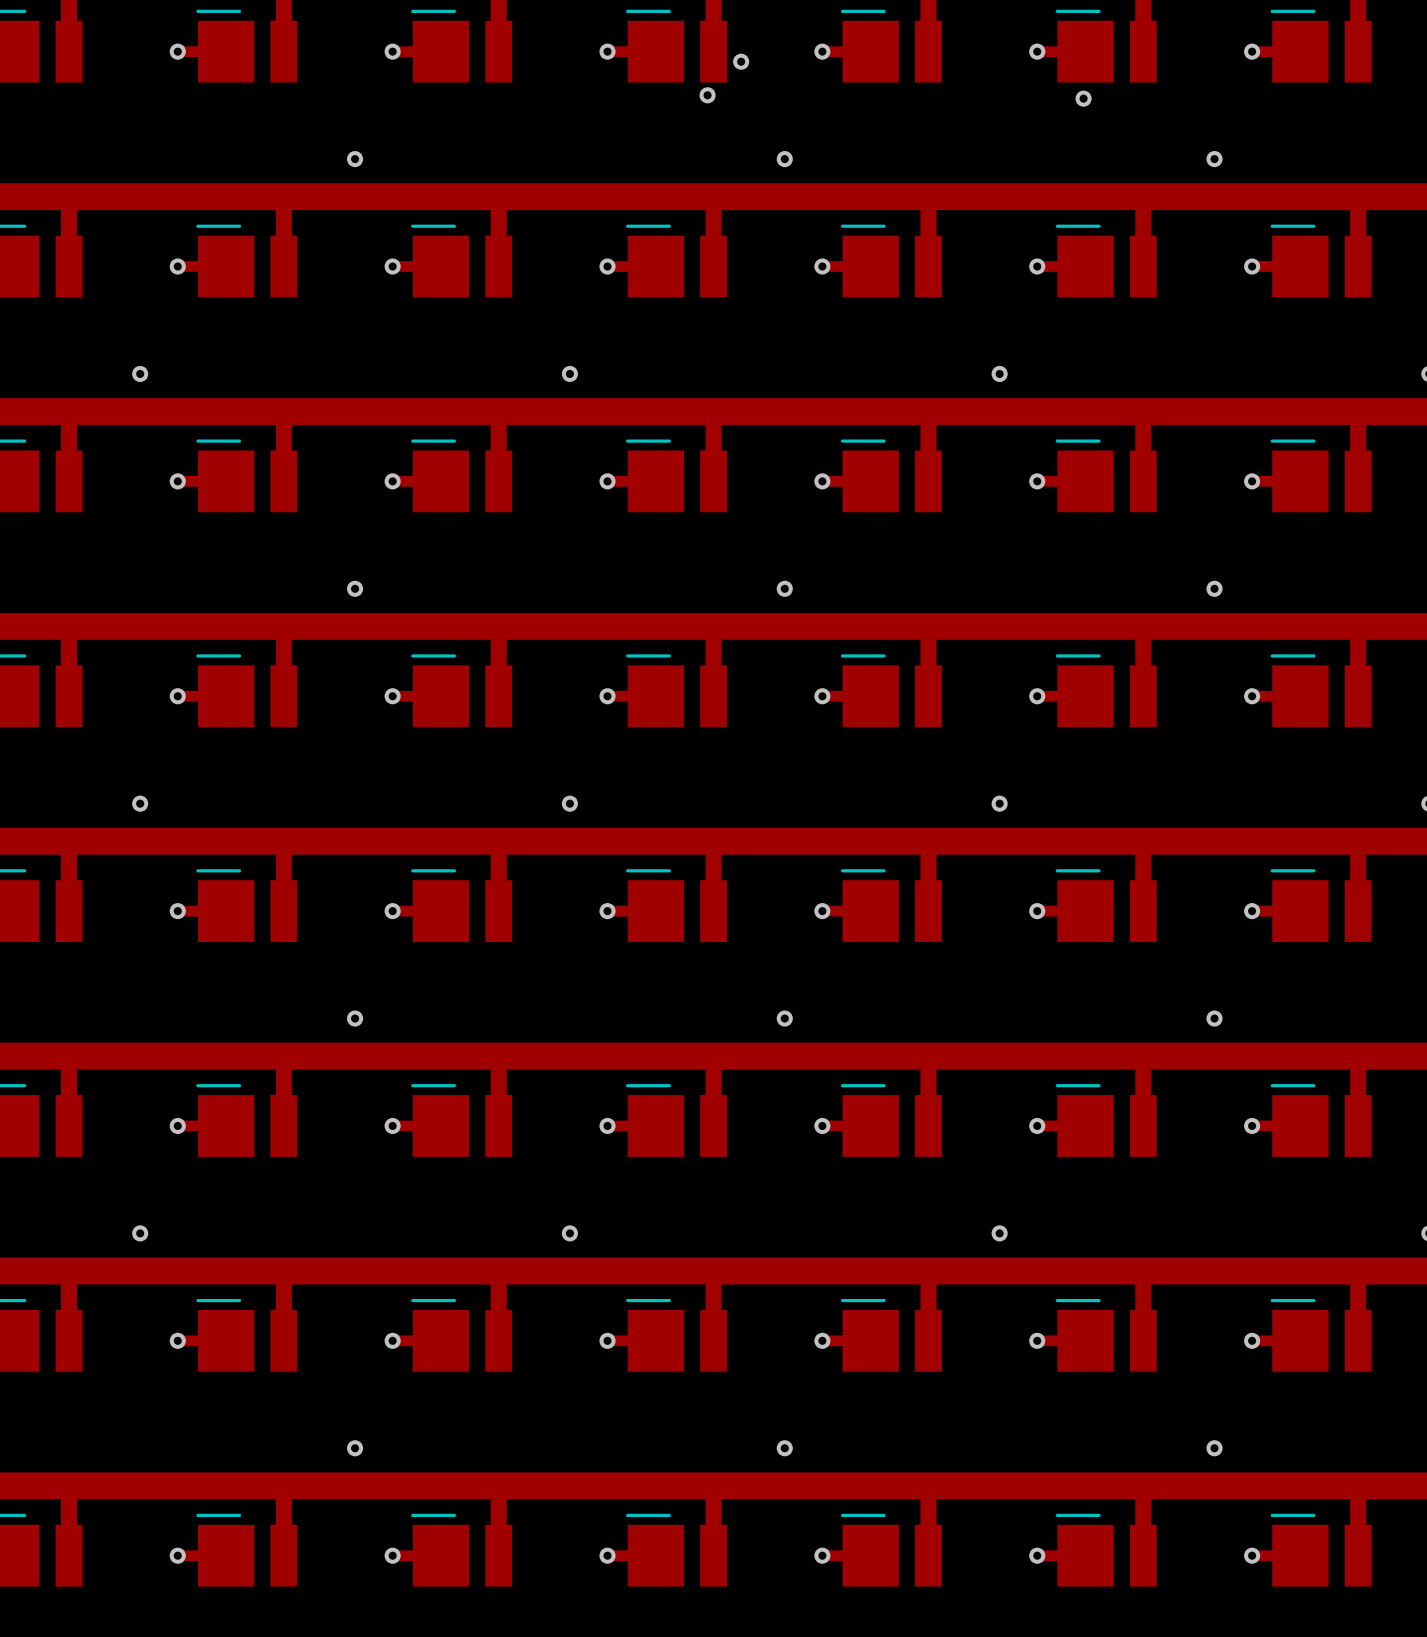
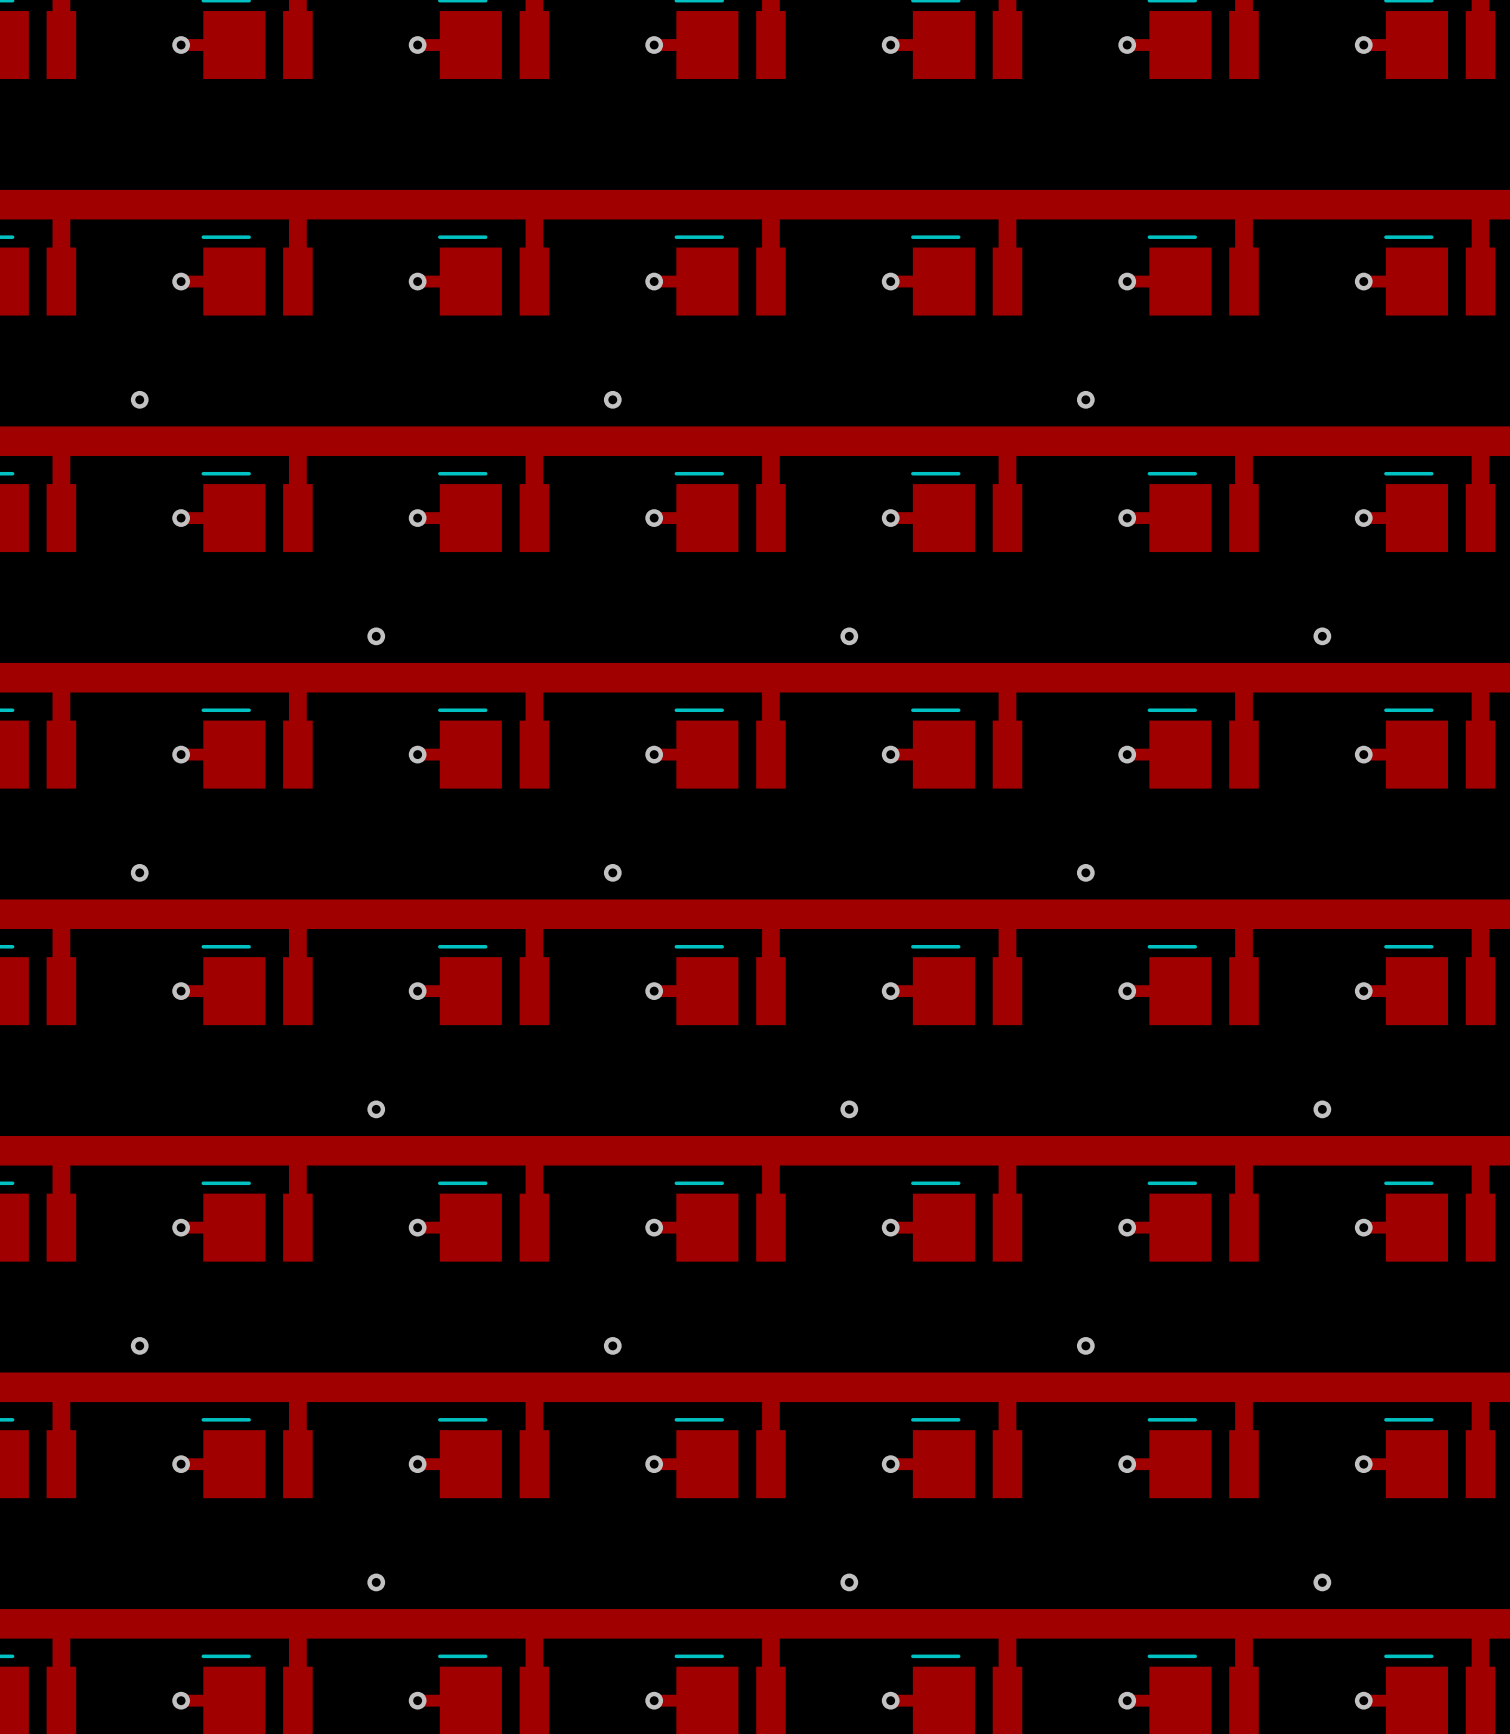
via: (741, 61) -> none
via: (707, 95) -> none
via: (1083, 98) -> none
via: (355, 159) -> none
via: (784, 159) -> none
via: (1214, 159) -> none

